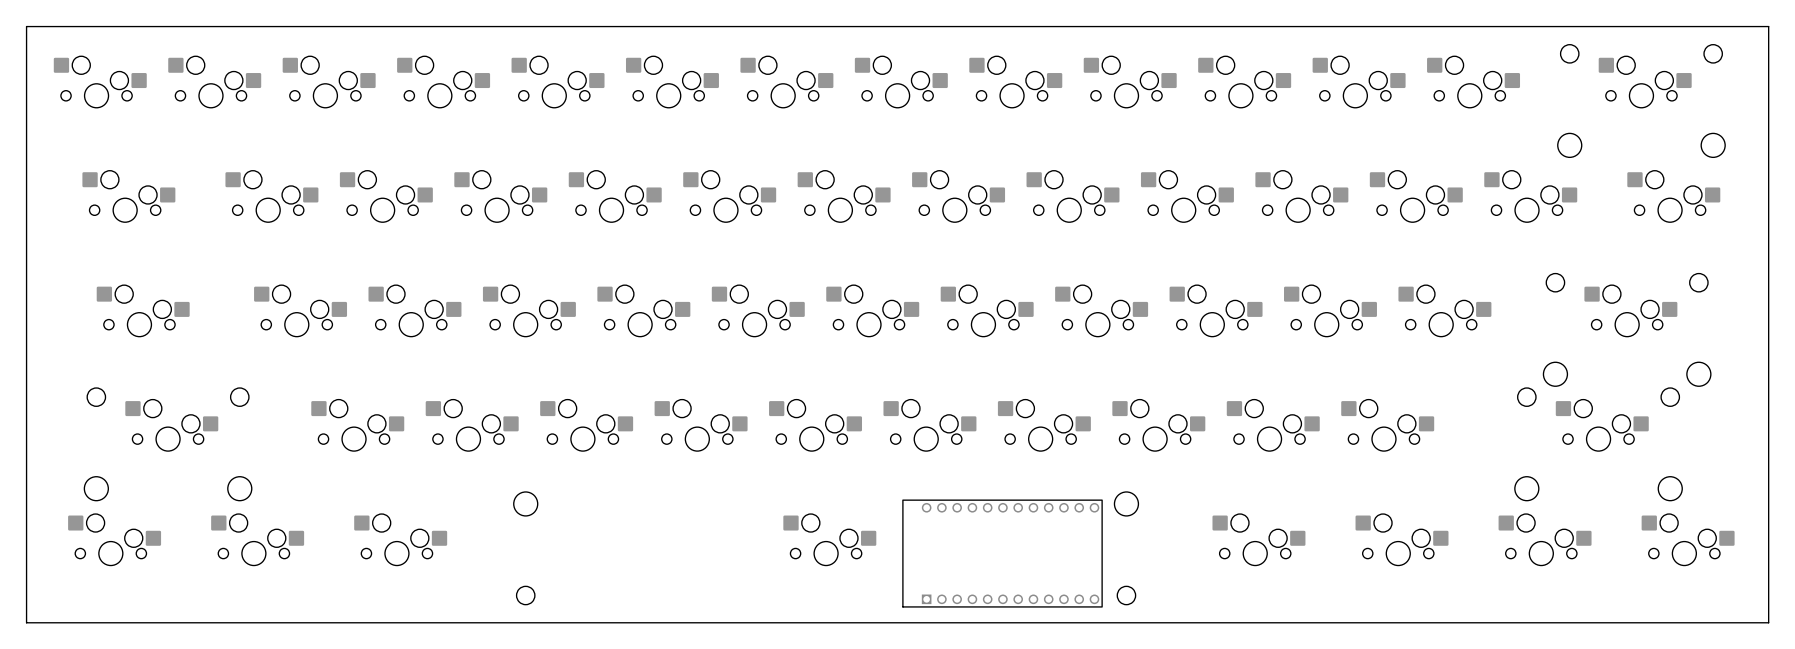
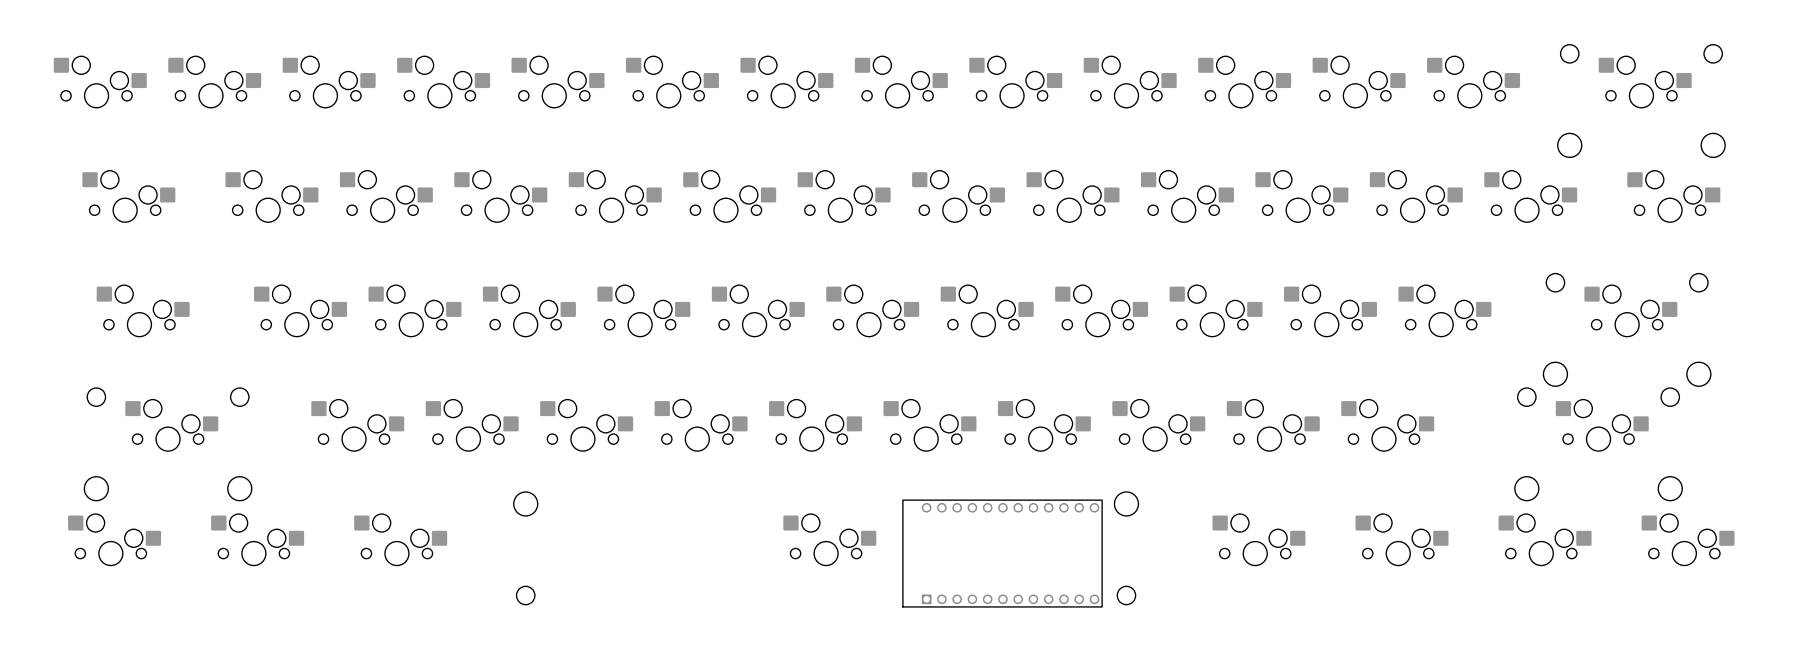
board edge: (26, 26) (1768, 26) (1768, 622) (26, 622) (26, 26) -> none

